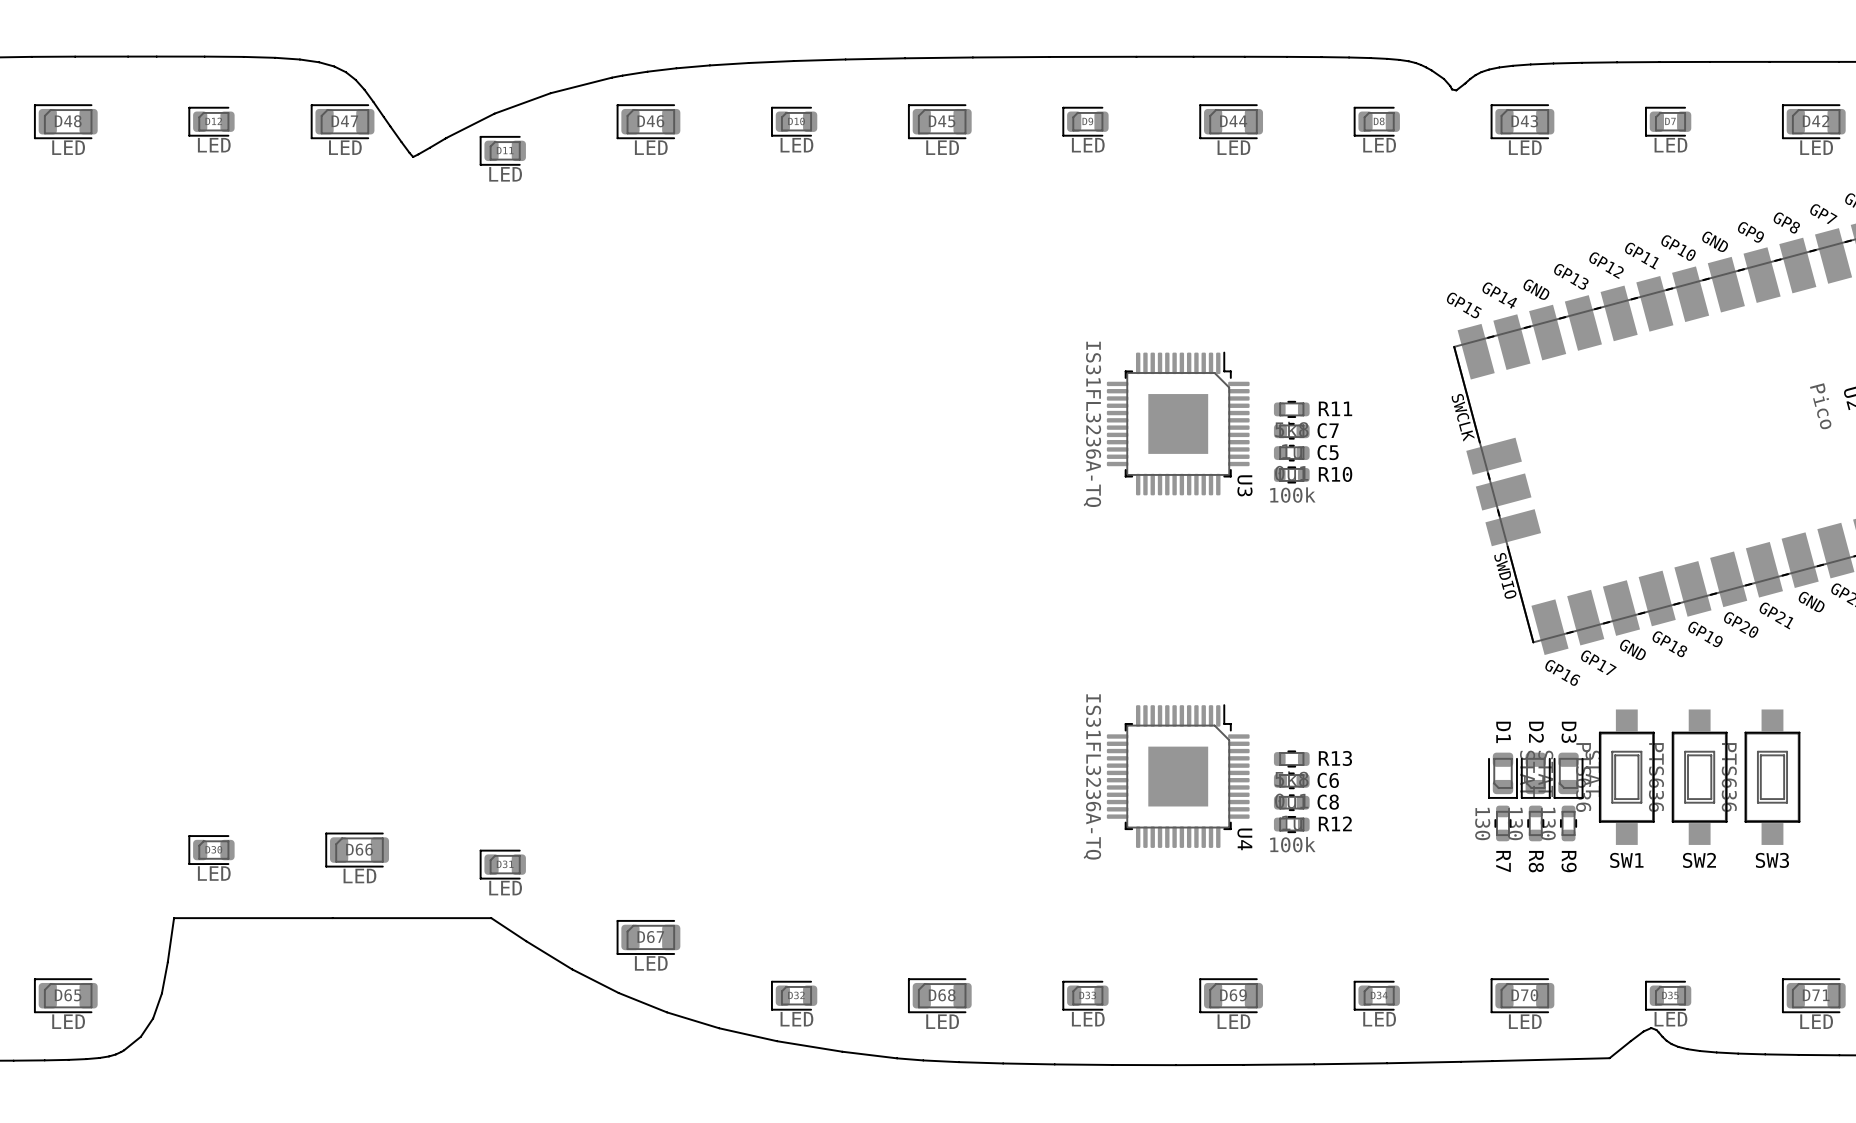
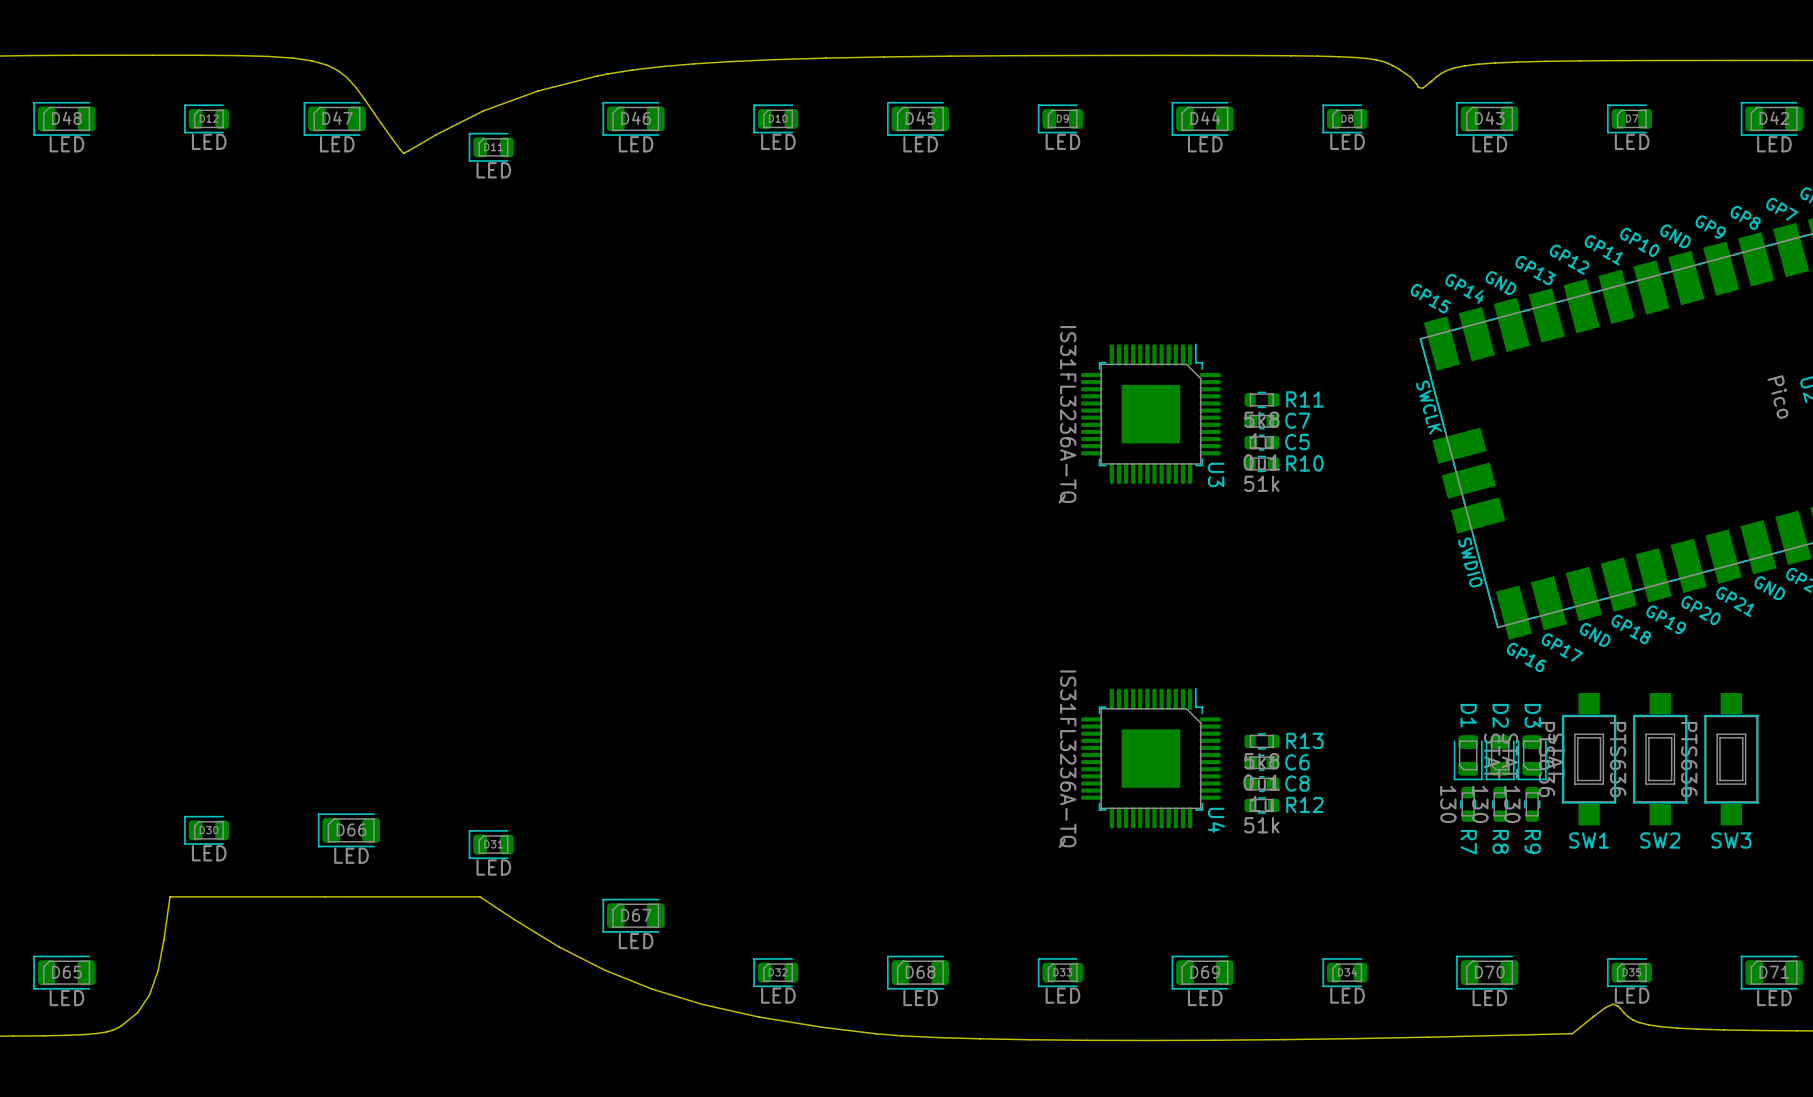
R10 value: 100k (1292, 495) -> 51k (1261, 483)
R12 value: 100k (1292, 844) -> 51k (1261, 825)

